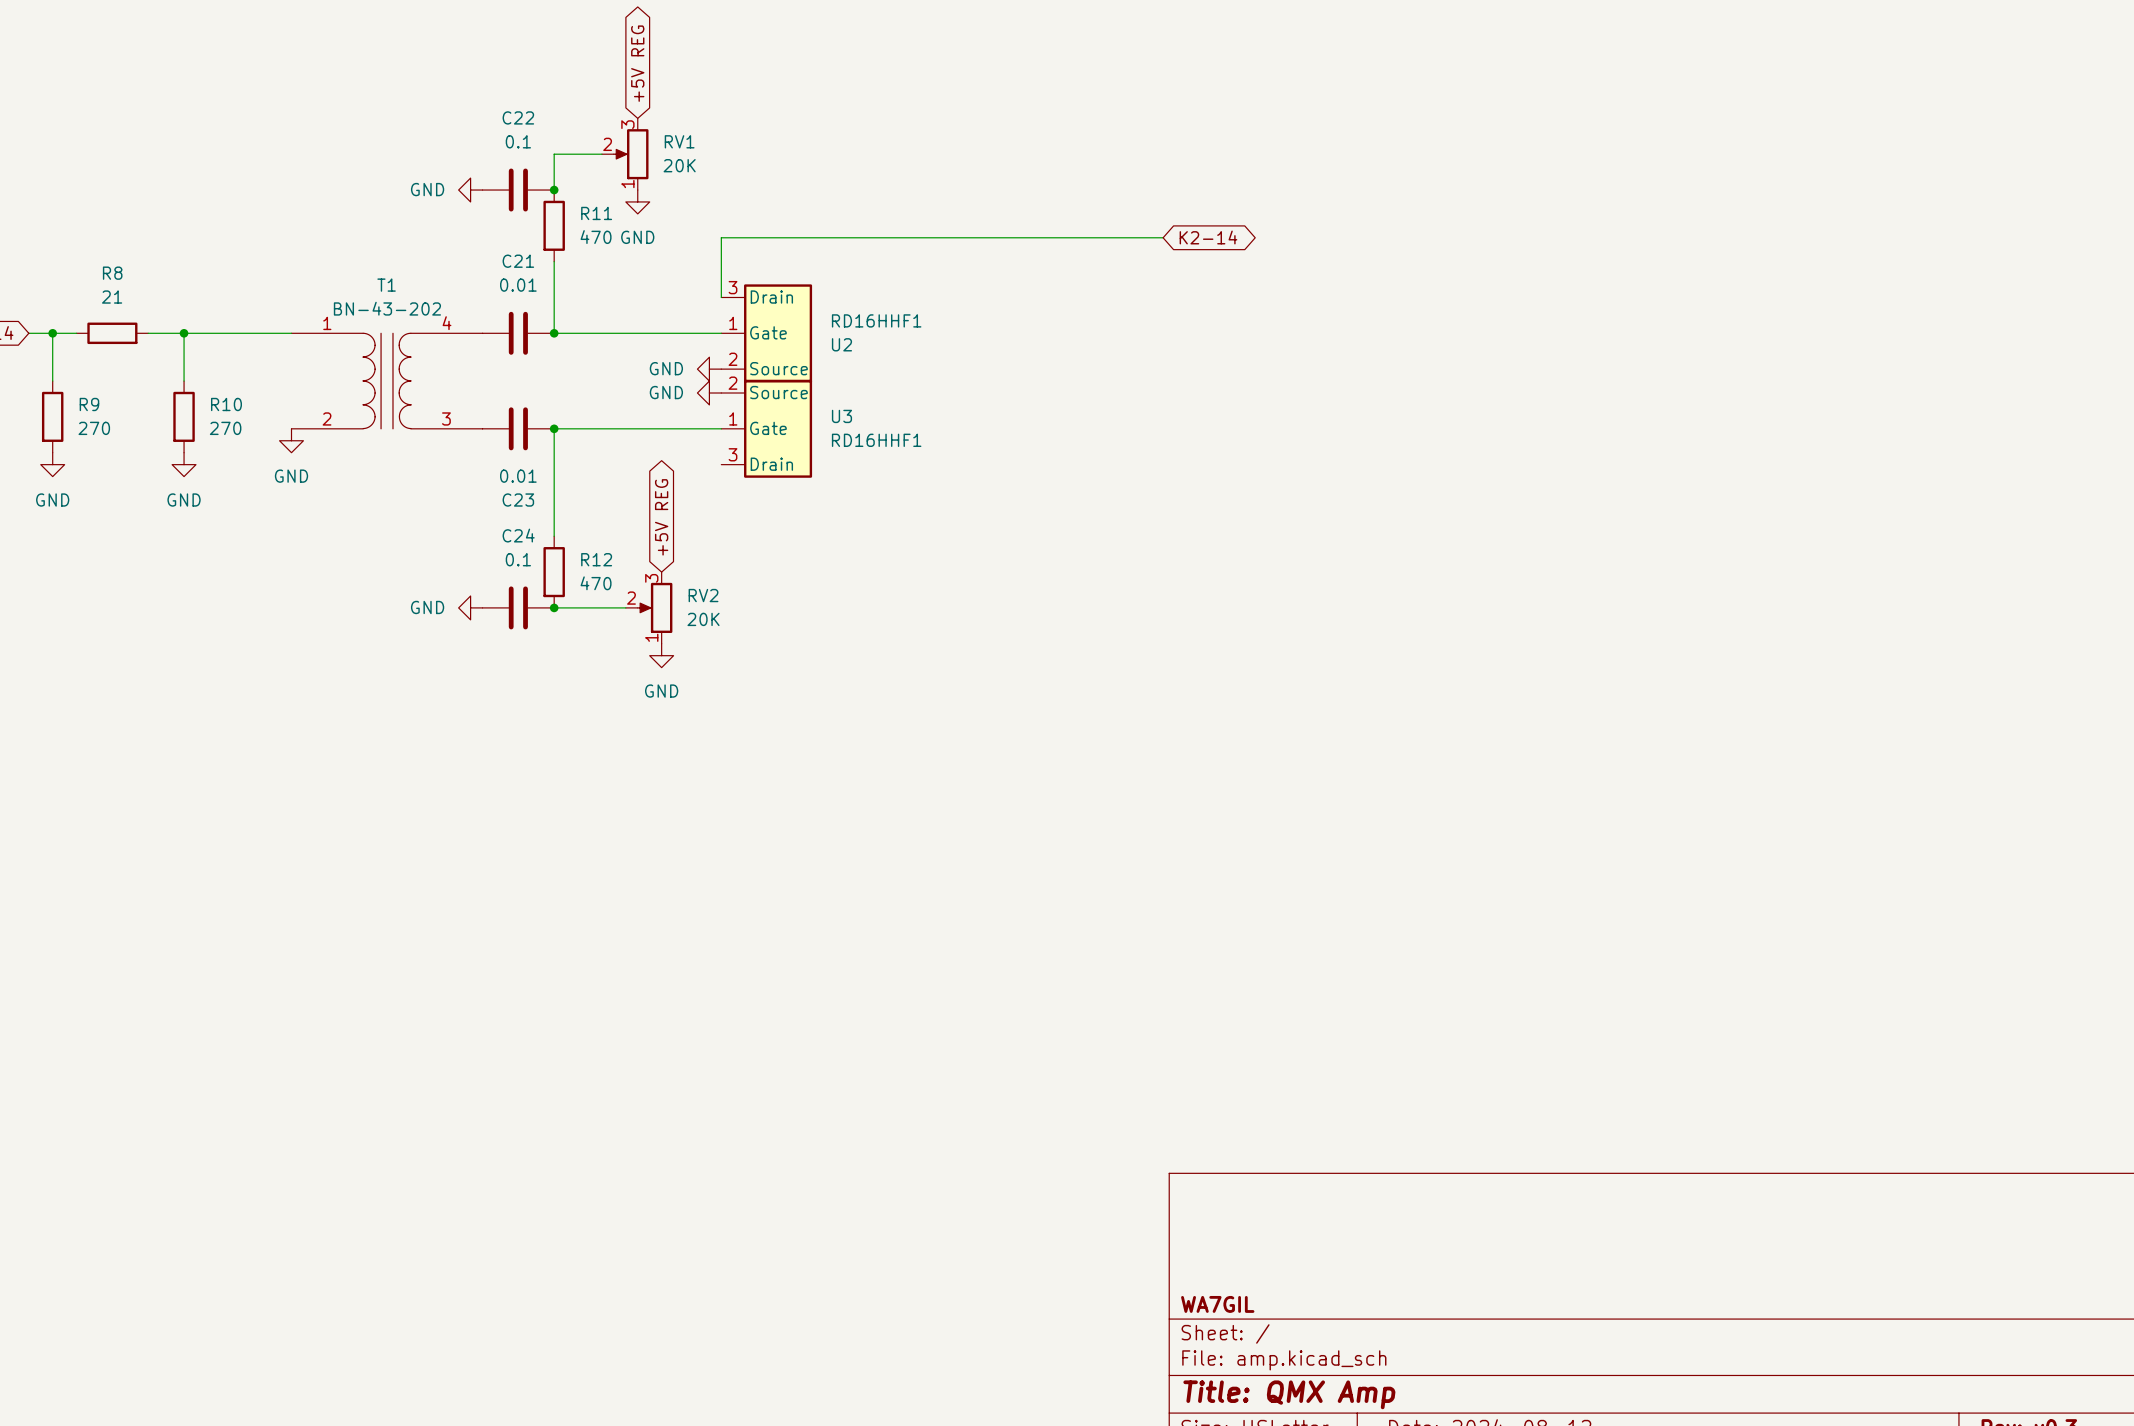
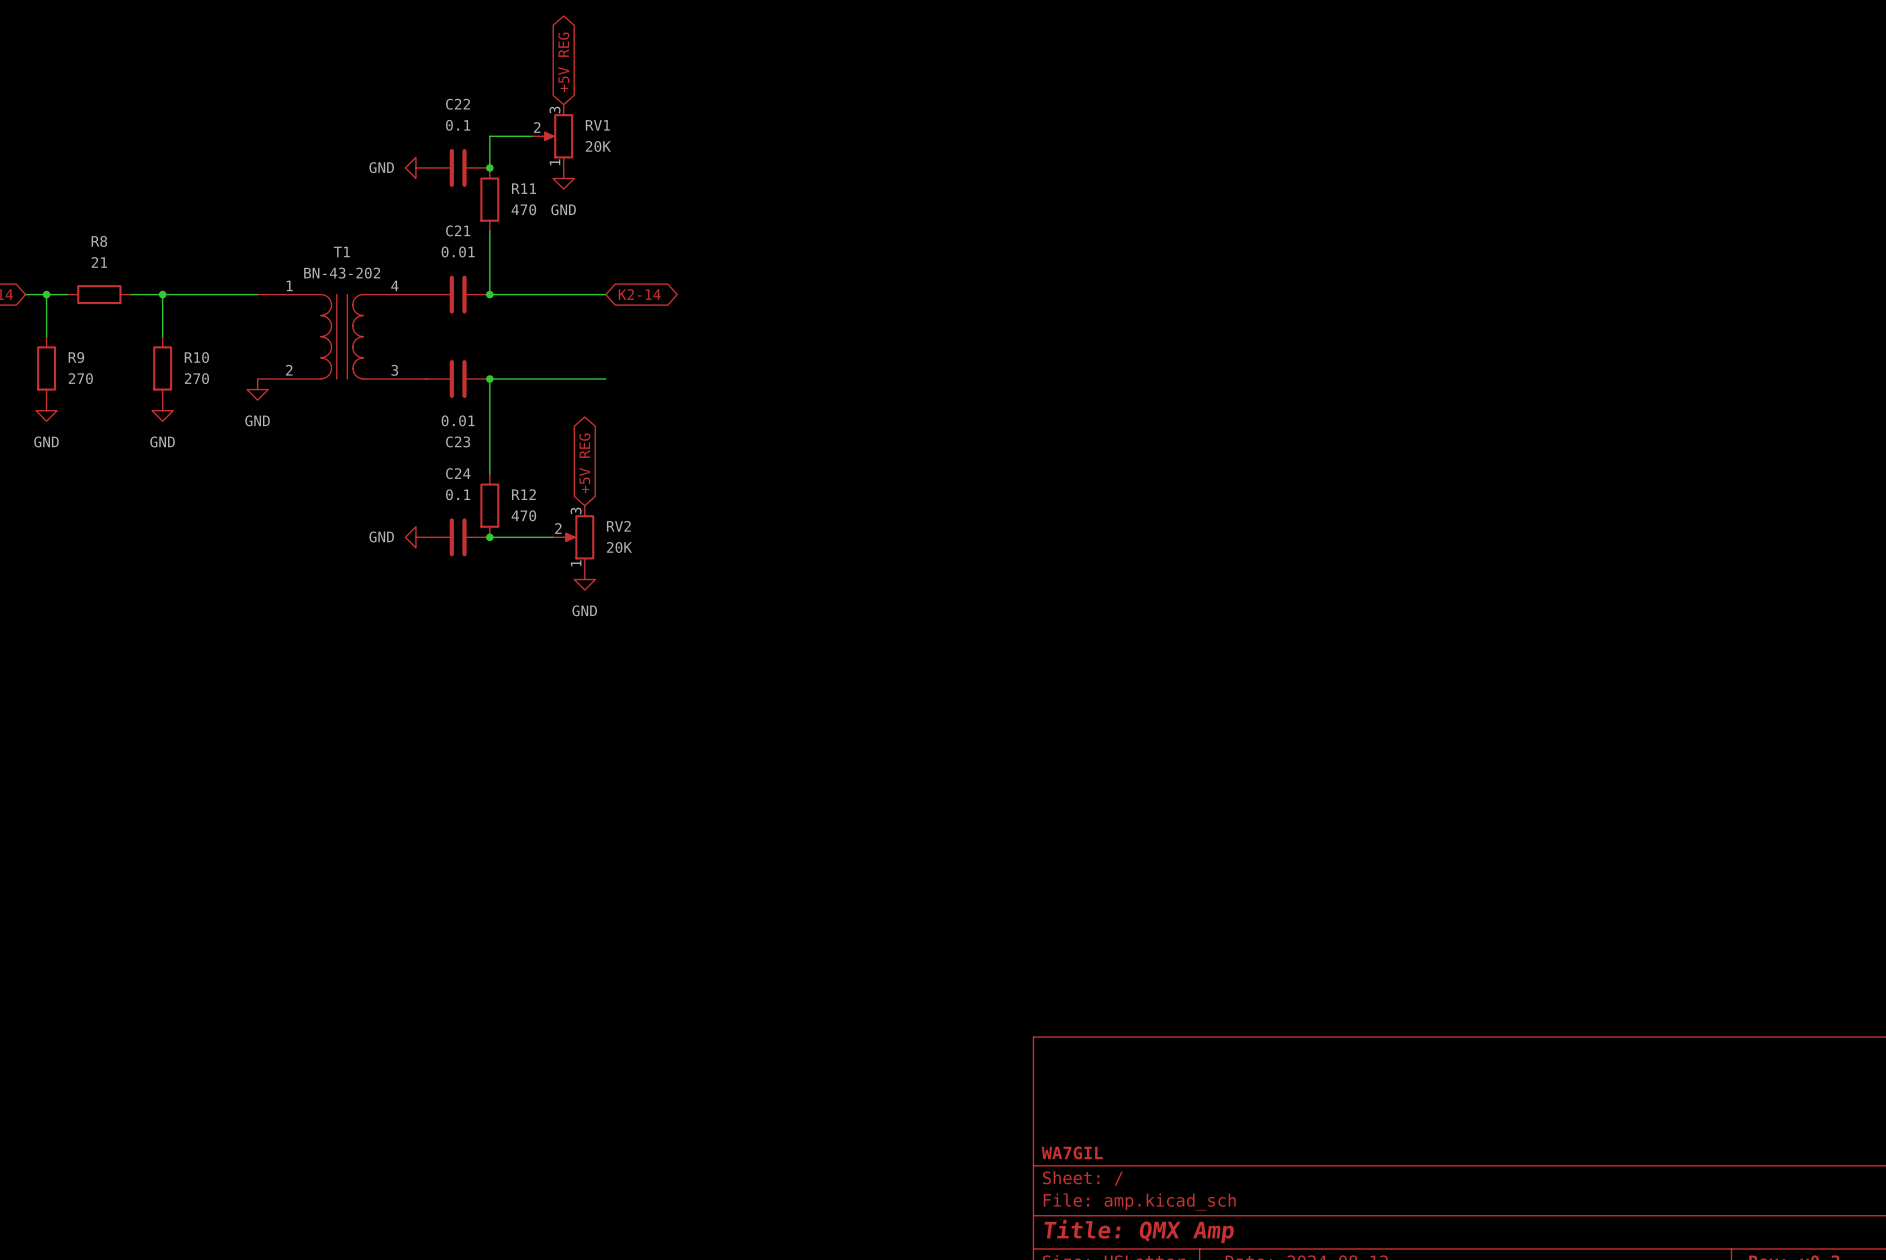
wire: (1163, 237) (721, 237) (721, 297) -> none
global label: K2-14 (1208, 237) -> none
wire: (685, 333) (721, 333) -> none
global label: none -> K2-14 (639, 294)
U2: RD16HHF1 (766, 333) -> none
power symbol: GND (709, 369) -> none
power symbol: GND (709, 393) -> none
wire: (685, 428) (721, 428) -> none
U3: RD16HHF1 (766, 428) -> none

